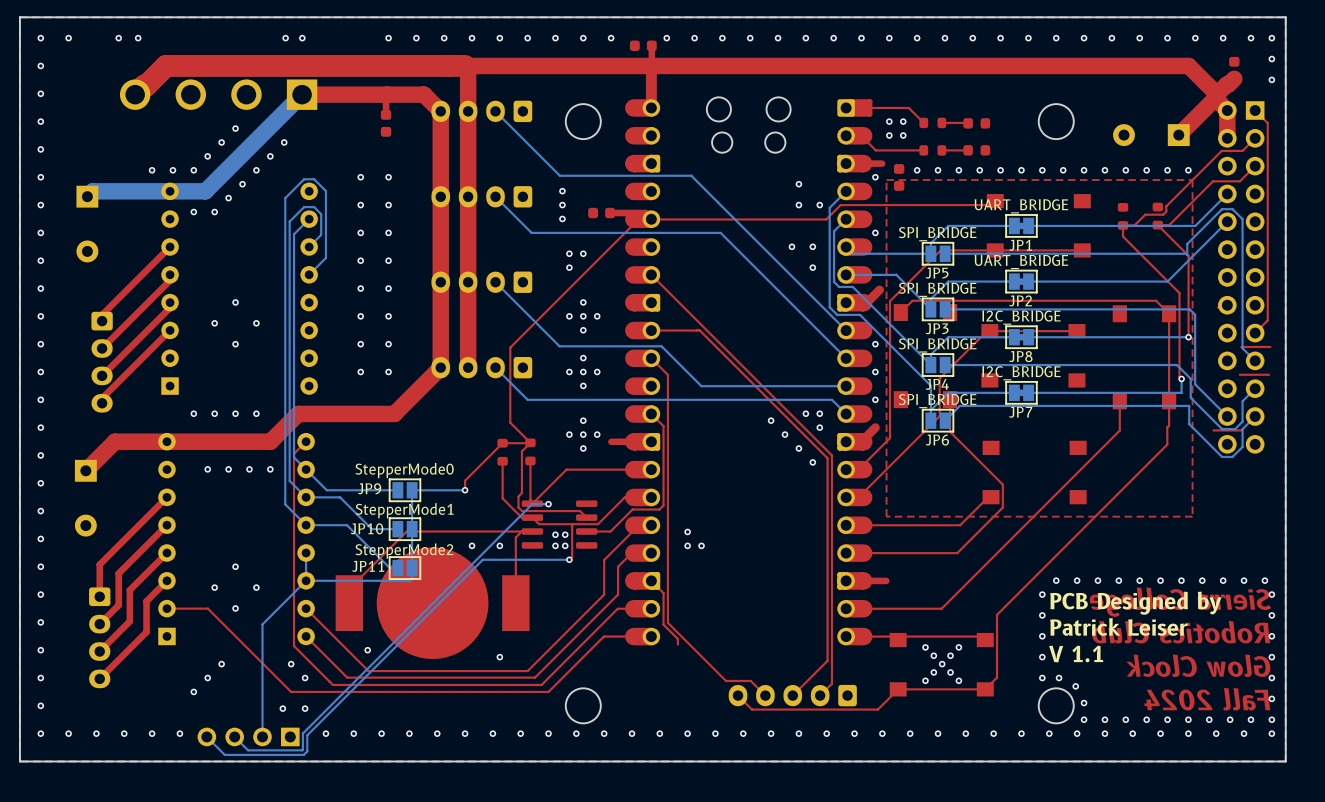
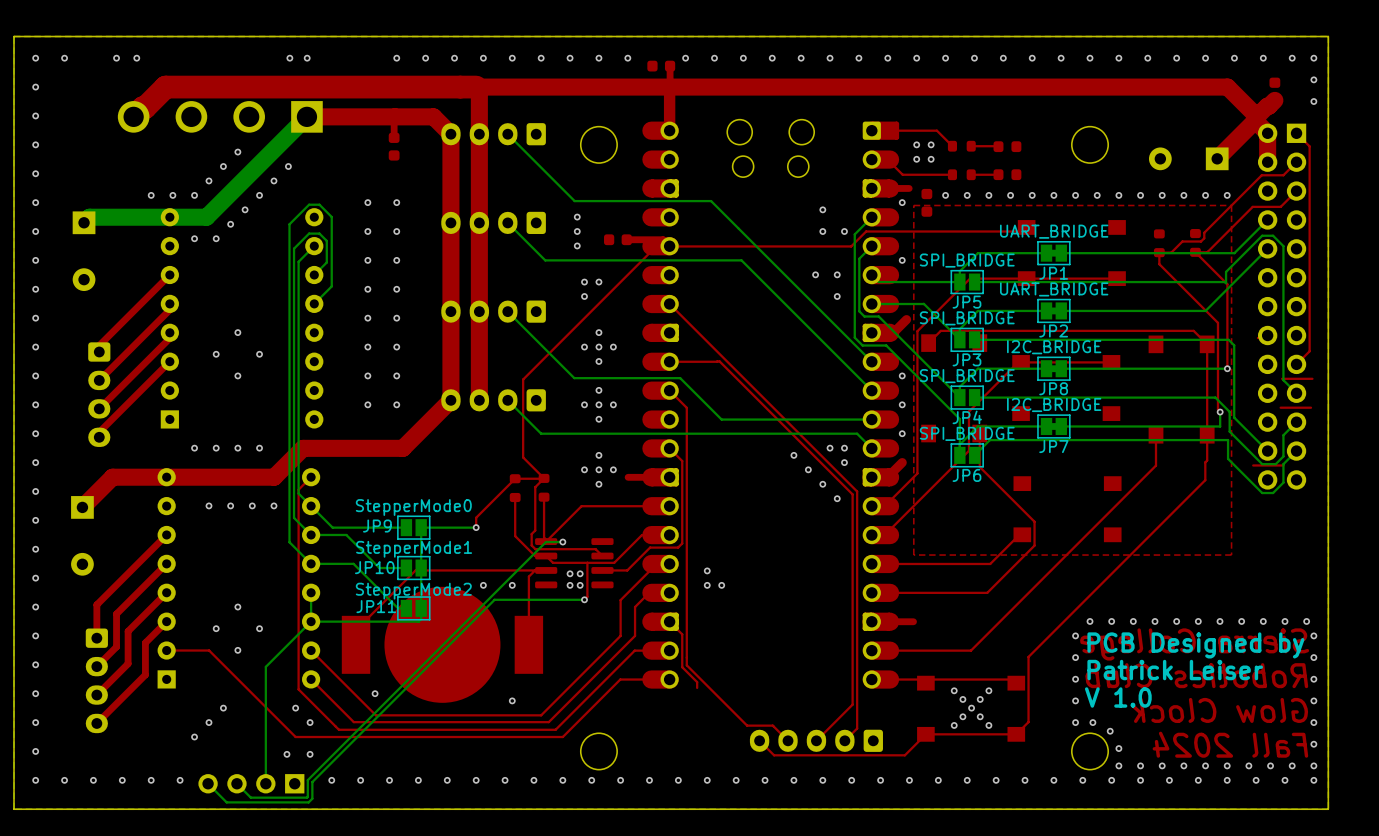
text: V 1.1 (1076, 654) -> V 1.0 (1118, 697)

